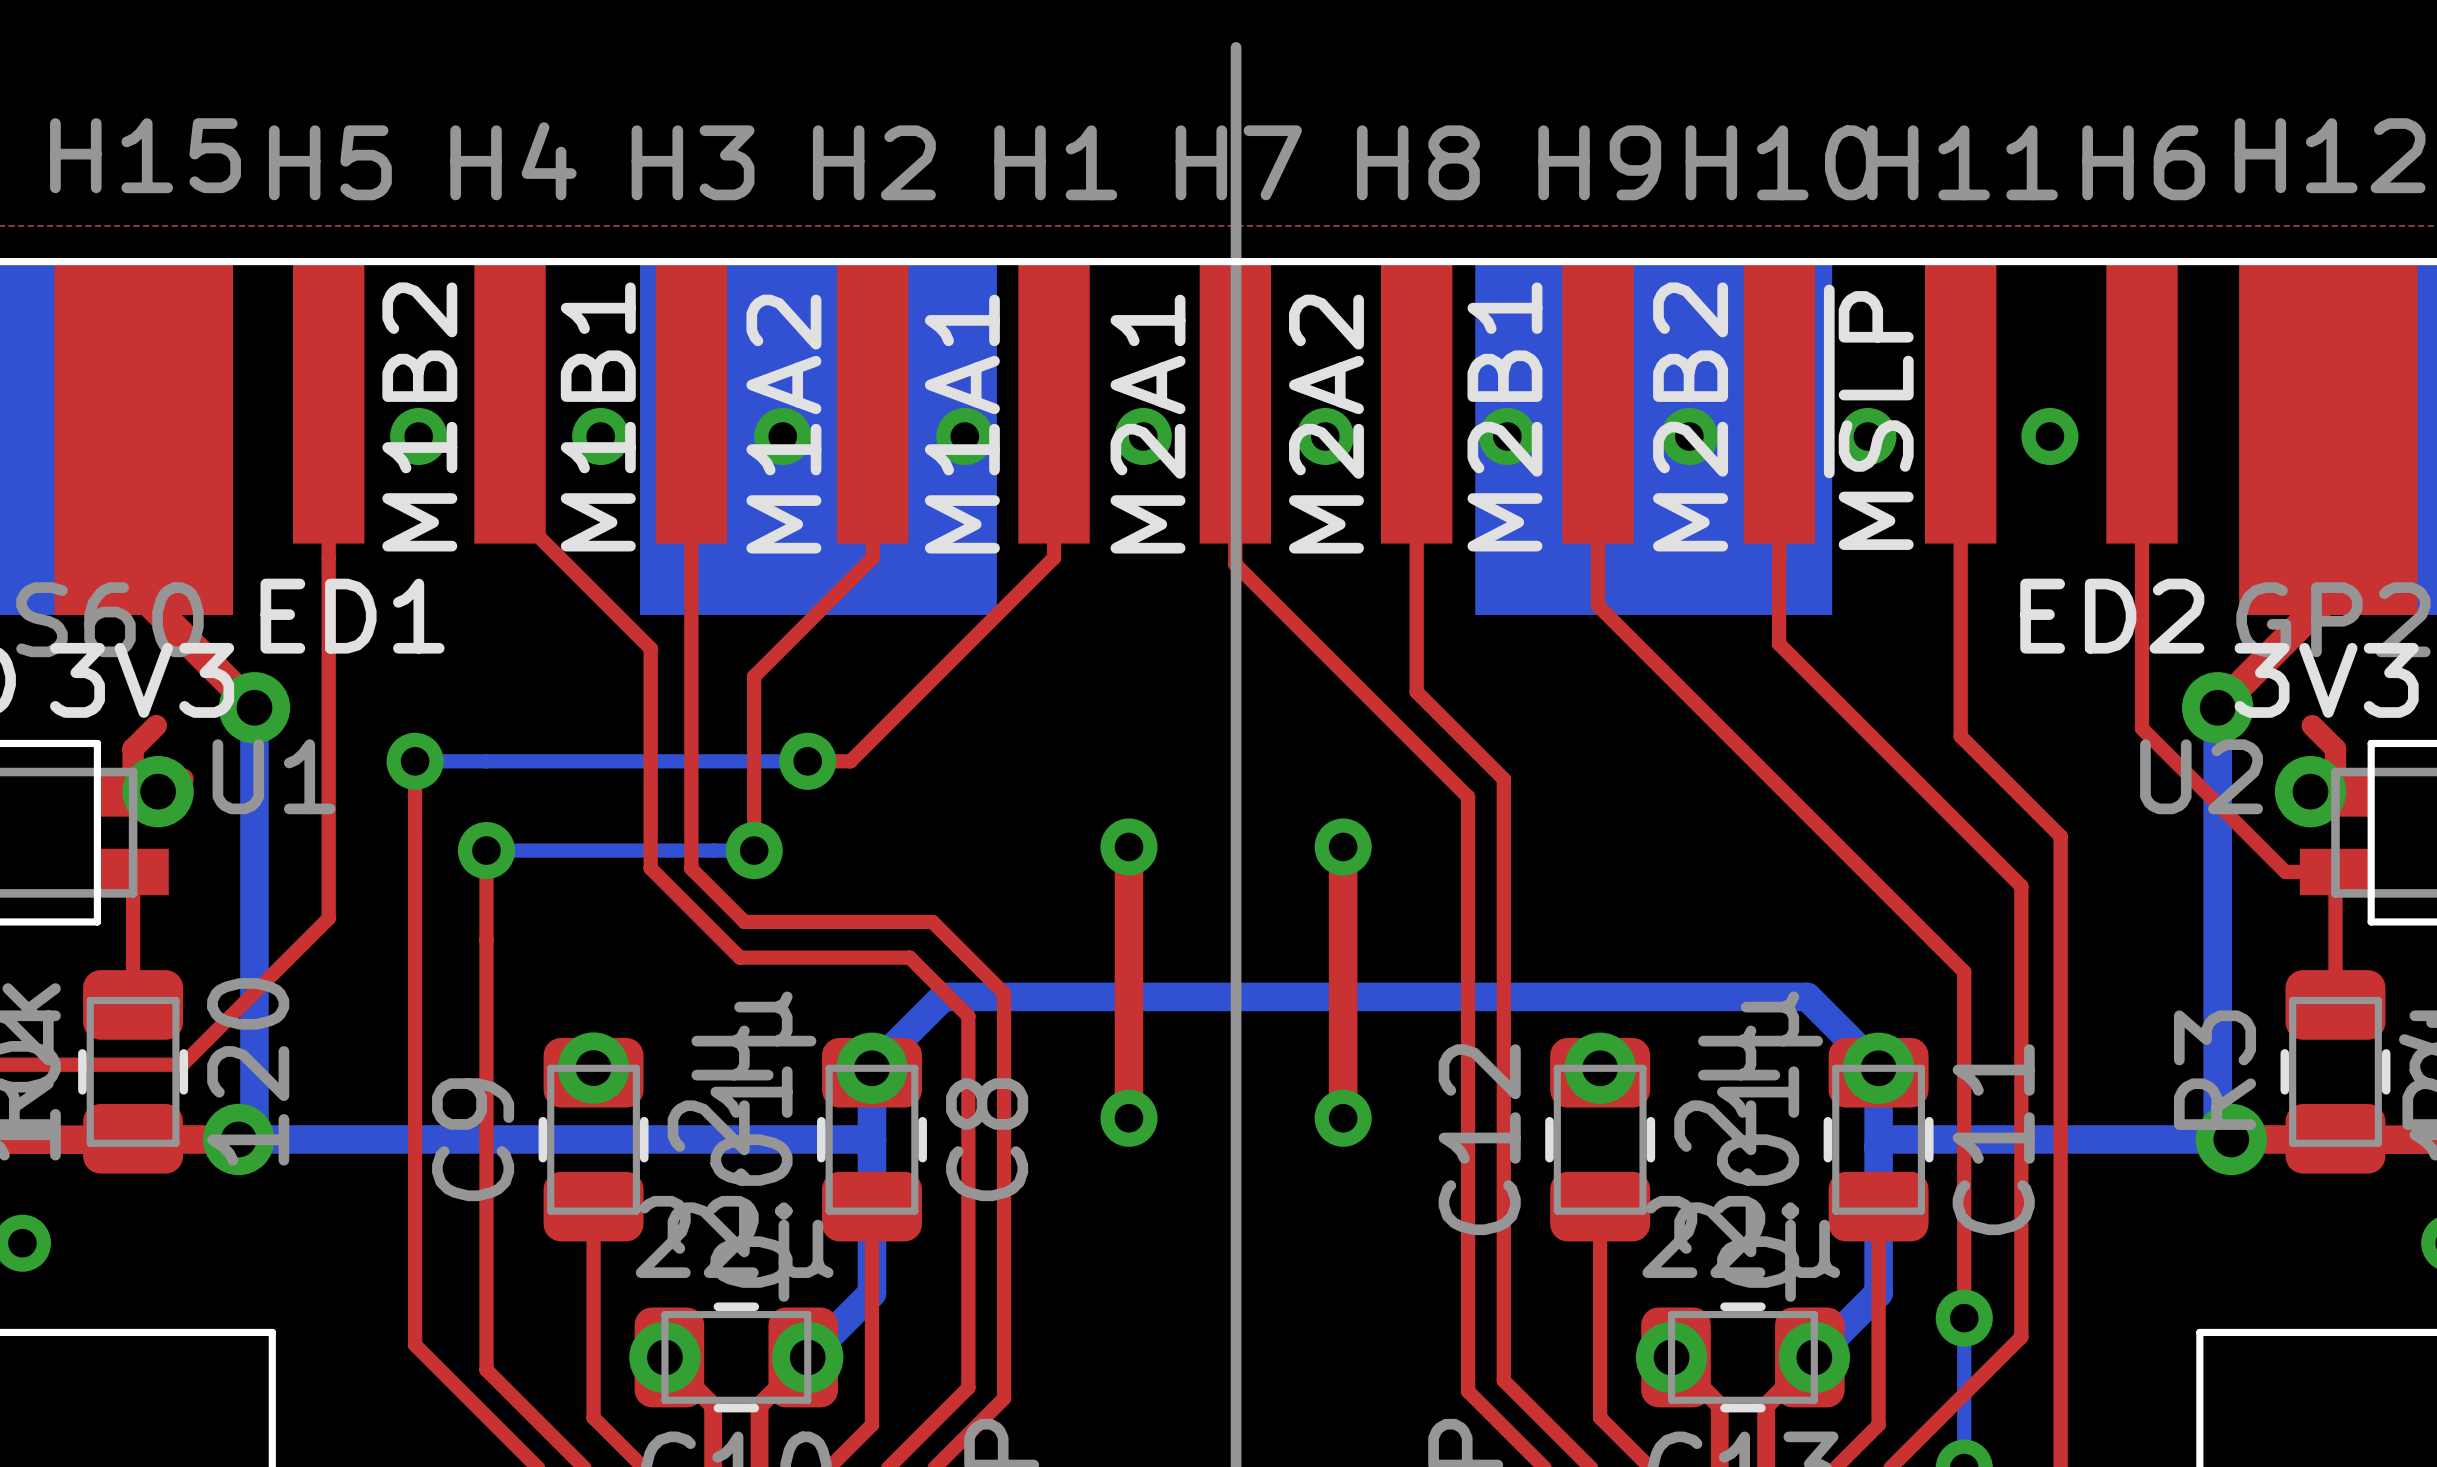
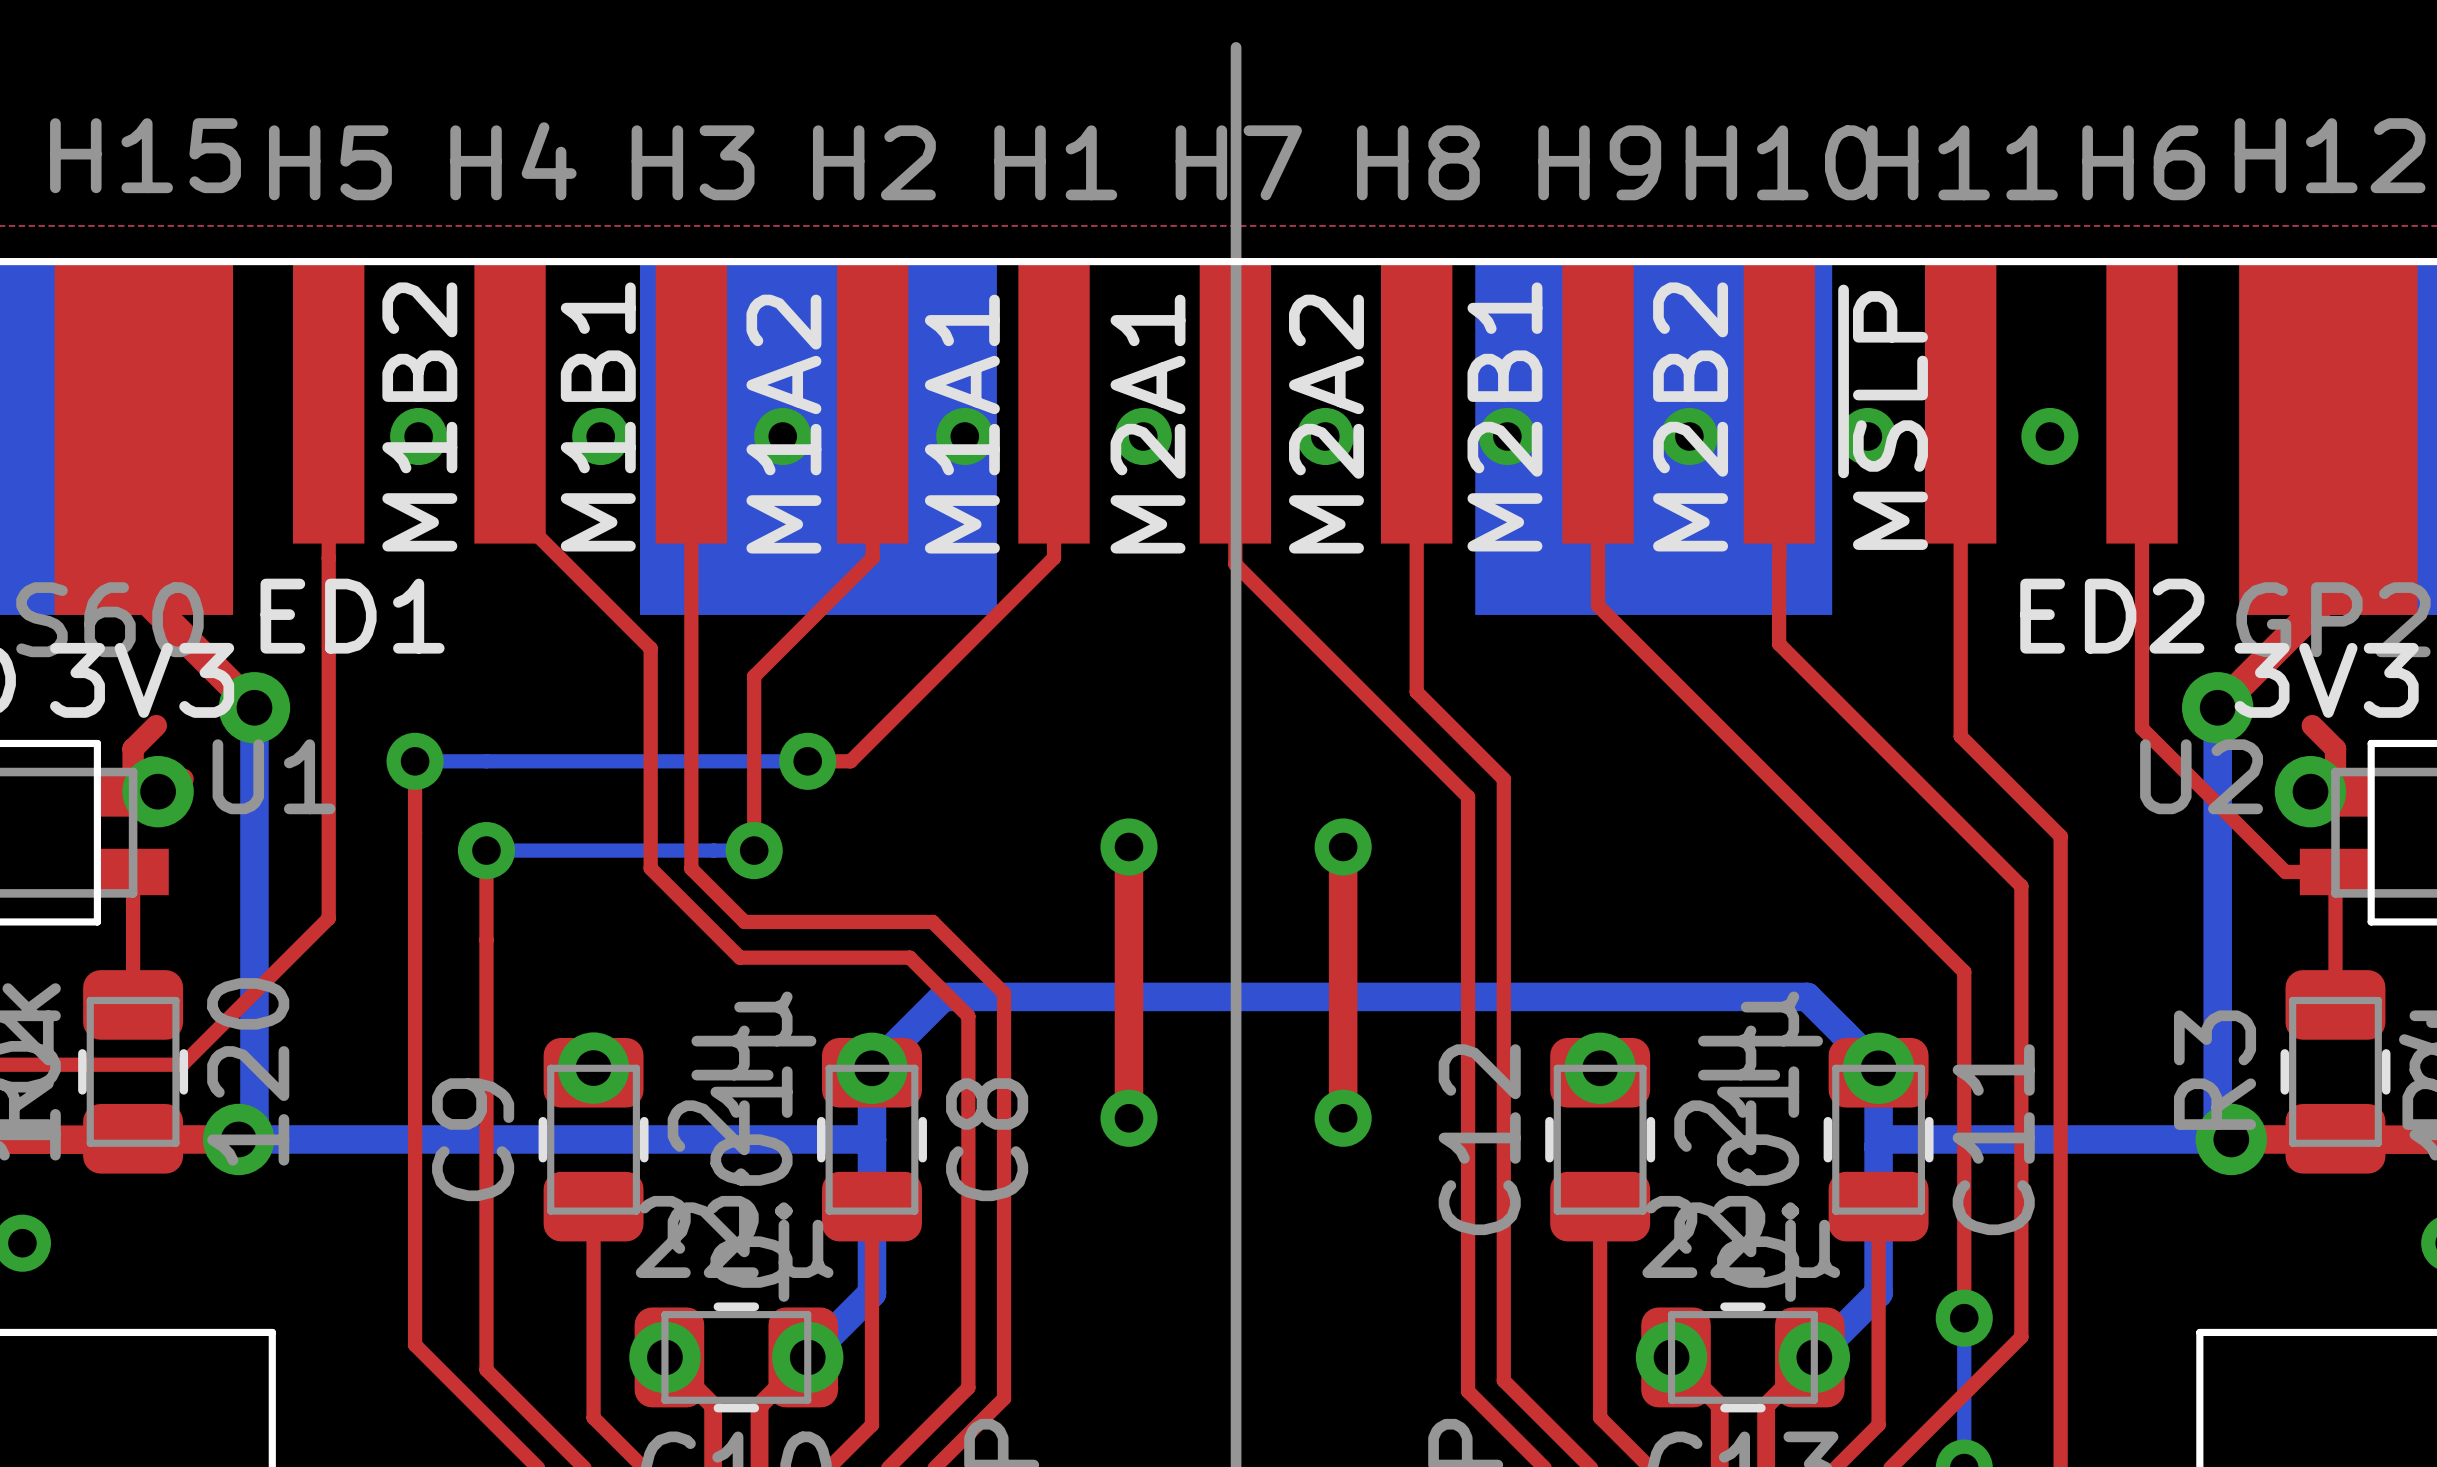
H11 value position: M~{SLP} (1868, 417) -> M~{SLP} (1883, 417)

